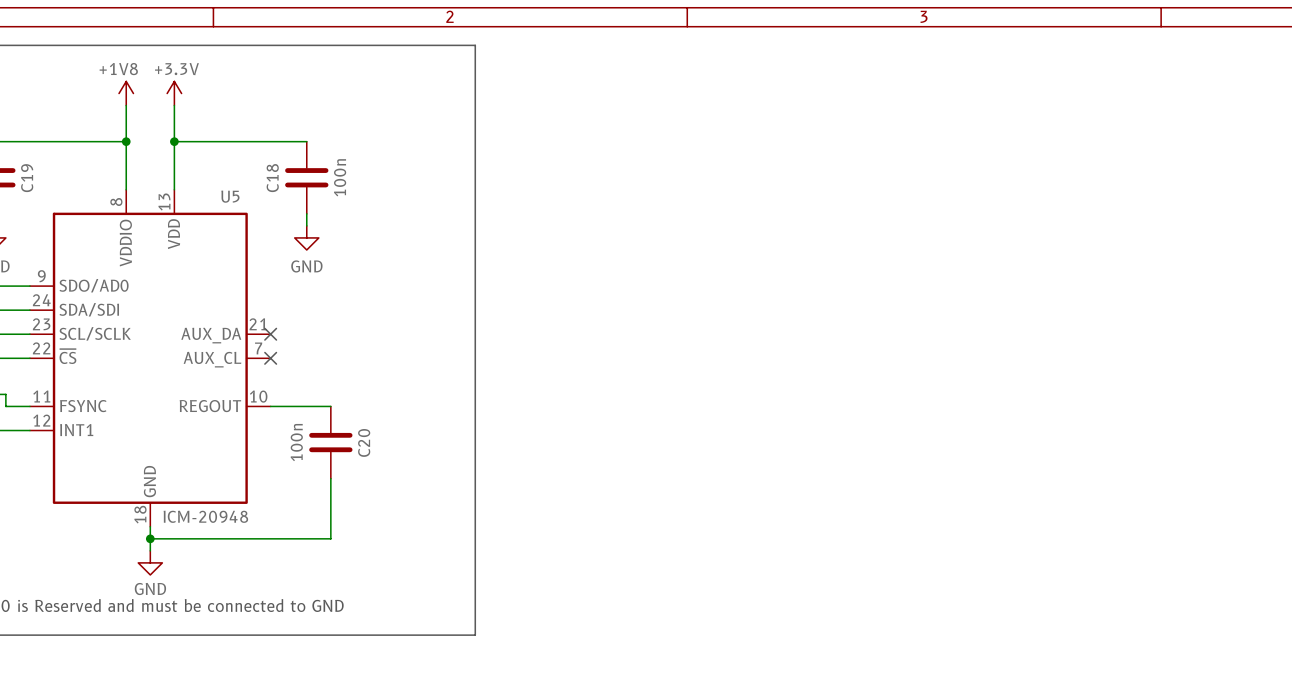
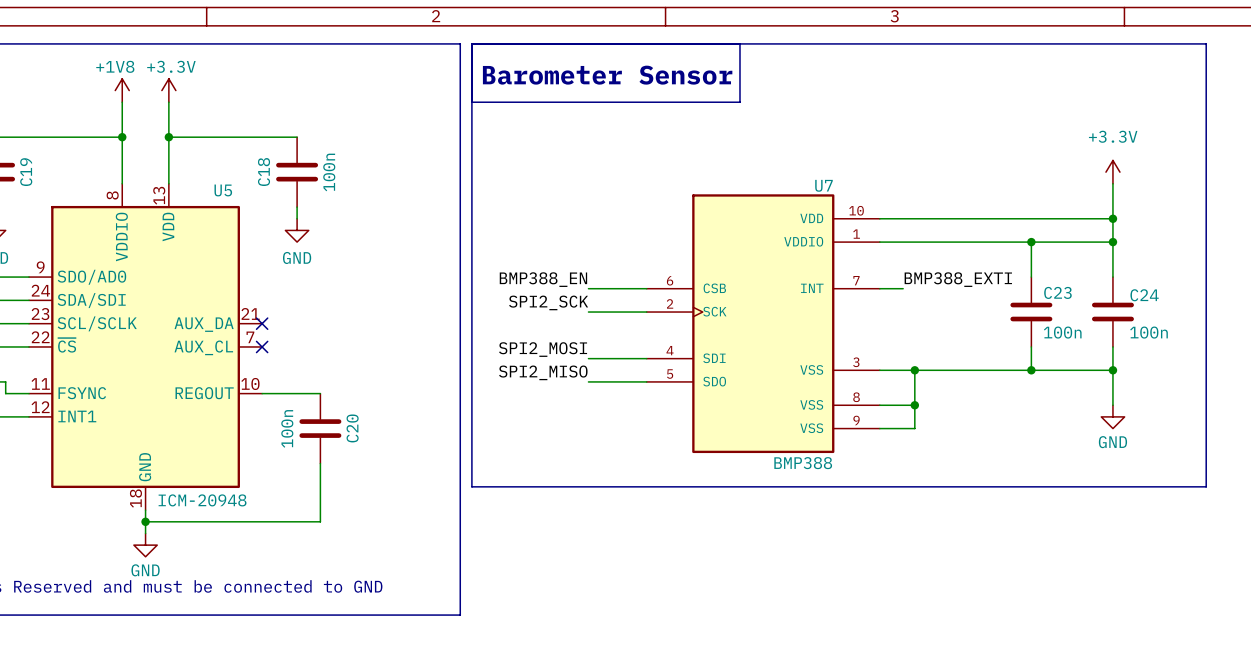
line: none -> (471, 43) (1206, 43) (1206, 486) (471, 486) (471, 43)
line: none -> (739, 43) (739, 102) (471, 102)
text: none -> Barometer Sensor (607, 75)
power symbol: none -> +3.3V (1112, 172)
wire: none -> (1112, 183) (1112, 277)
wire: none -> (879, 218) (1112, 218)
junction: none -> (1112, 218)
wire: none -> (879, 242) (1112, 242)
wire: none -> (1031, 242) (1031, 277)
junction: none -> (1031, 242)
junction: none -> (1112, 242)
label: none -> BMP388_EN (543, 279)
label: none -> BMP388_EXTI (958, 279)
wire: none -> (588, 288) (646, 288)
wire: none -> (879, 288) (903, 288)
label: none -> SPI2_SCK (548, 302)
wire: none -> (588, 312) (646, 312)
C23: none -> 100n (1031, 312)
C24: none -> 100n (1112, 312)
U7: none -> BMP388 (763, 323)
wire: none -> (1031, 346) (1031, 370)
wire: none -> (1112, 346) (1112, 405)
label: none -> SPI2_MOSI (543, 349)
wire: none -> (588, 358) (646, 358)
wire: none -> (879, 370) (1112, 370)
wire: none -> (914, 370) (914, 428) (879, 428)
junction: none -> (914, 370)
junction: none -> (1031, 370)
junction: none -> (1112, 370)
label: none -> SPI2_MISO (543, 372)
wire: none -> (588, 381) (646, 381)
wire: none -> (879, 405) (914, 405)
junction: none -> (914, 405)
power symbol: none -> GND (1112, 416)

